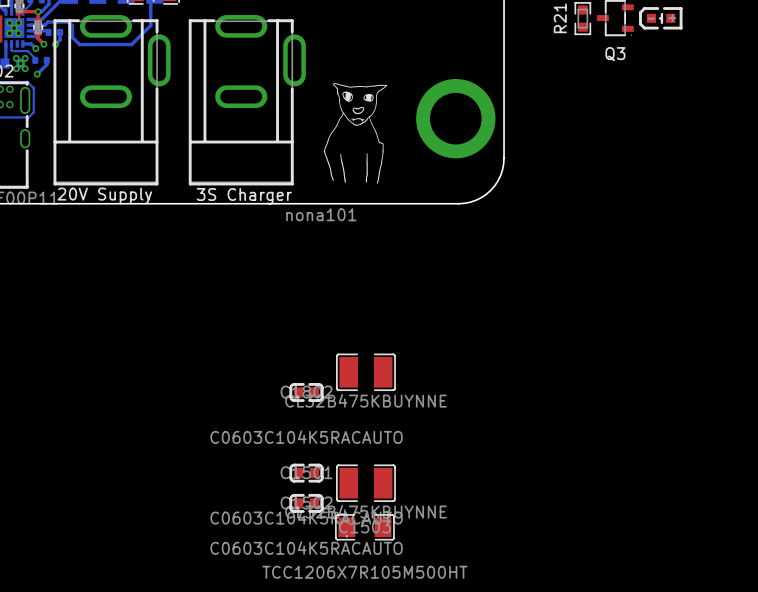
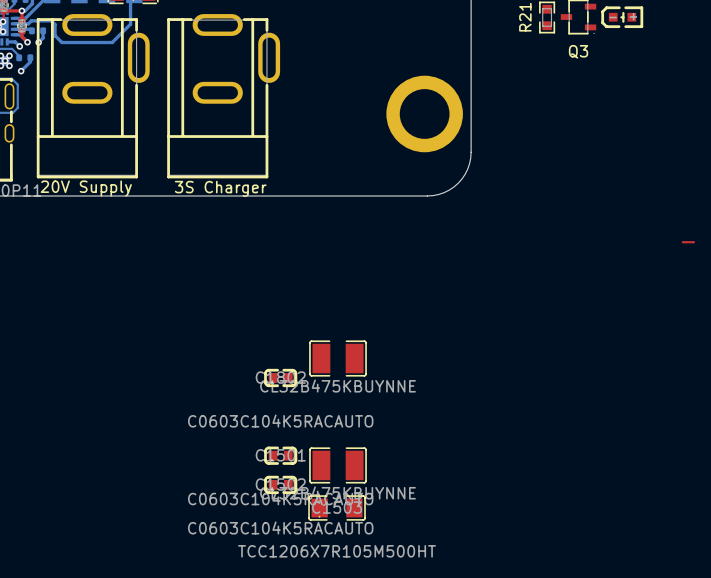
nona101: (355, 133) -> none
part: none -> (688, 242)

